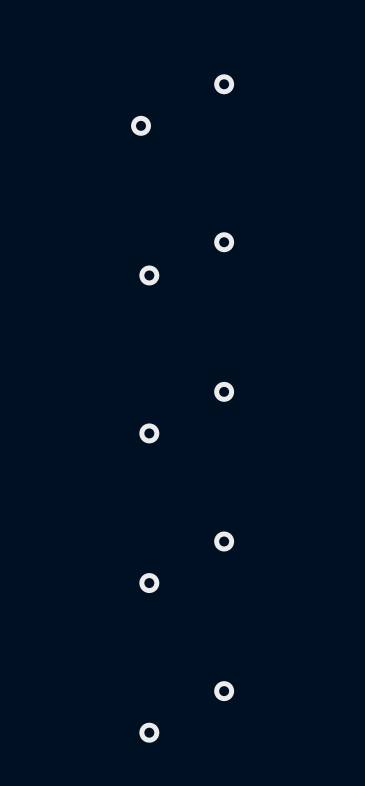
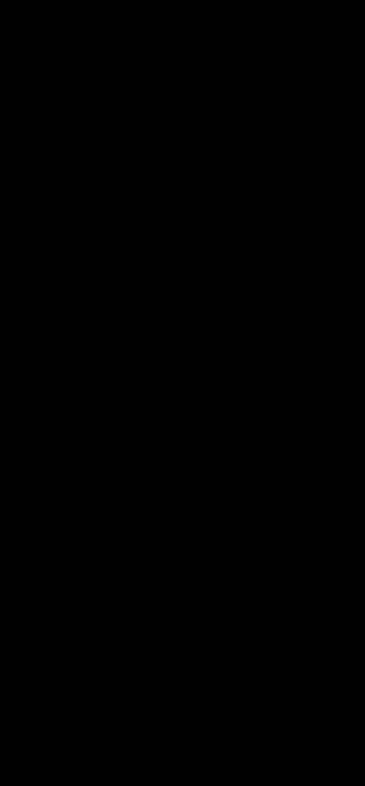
via: (224, 84) -> none
via: (141, 125) -> none
via: (224, 242) -> none
via: (149, 275) -> none
via: (224, 391) -> none
via: (149, 433) -> none
via: (224, 541) -> none
via: (149, 583) -> none
via: (224, 691) -> none
via: (149, 732) -> none

